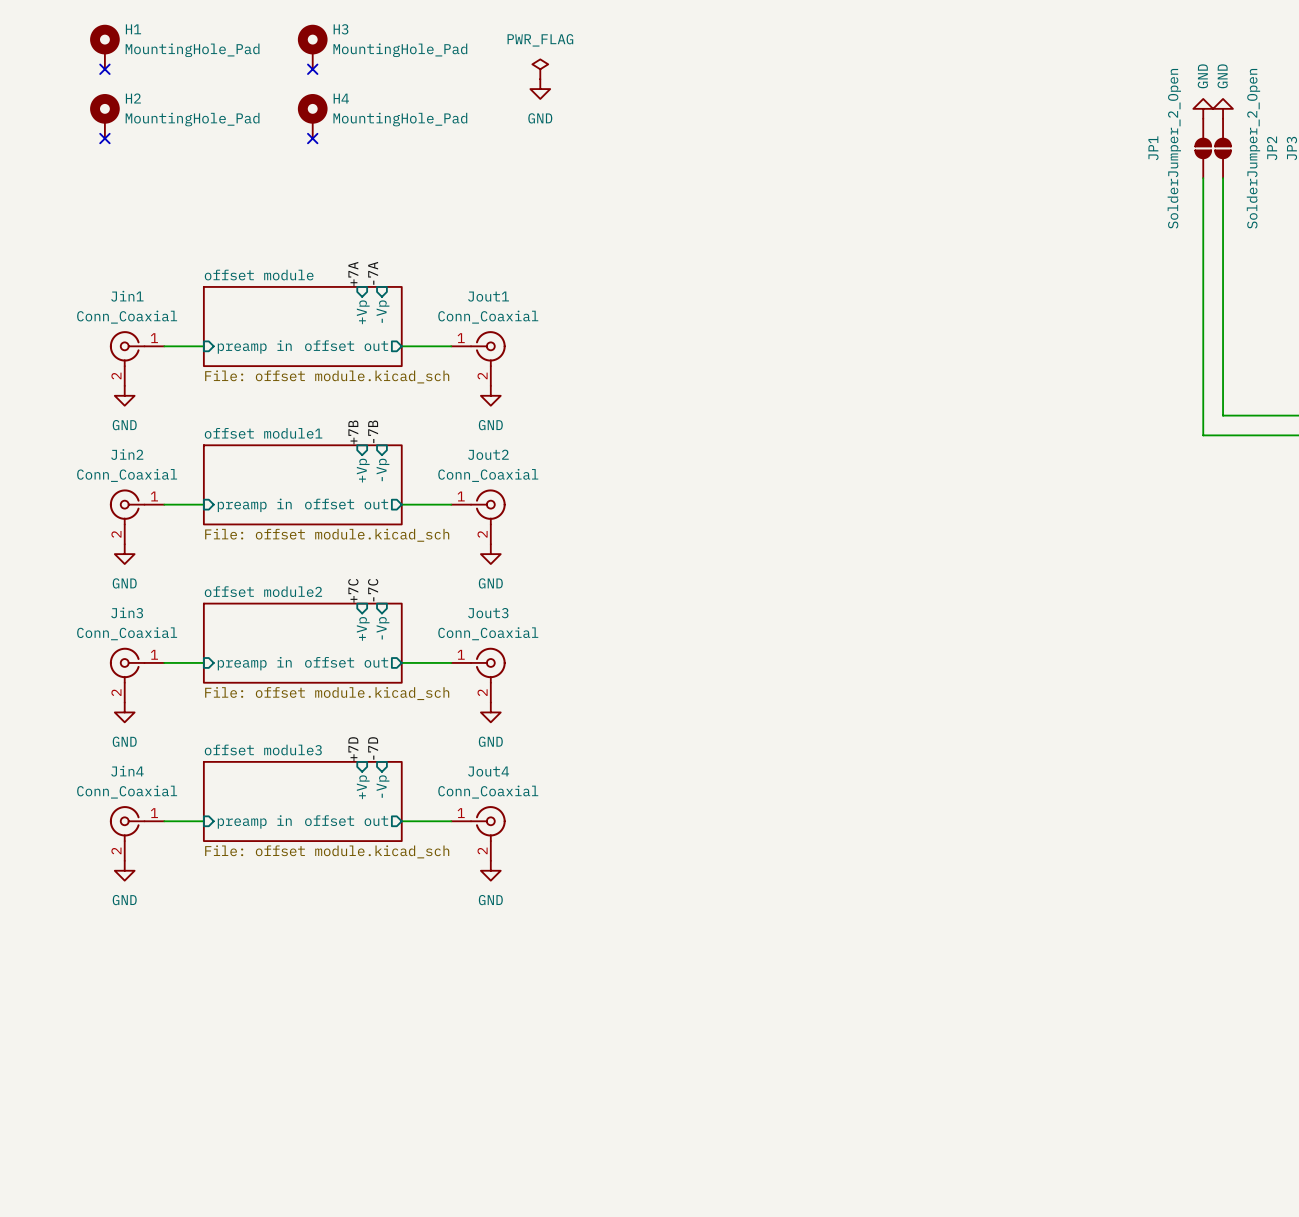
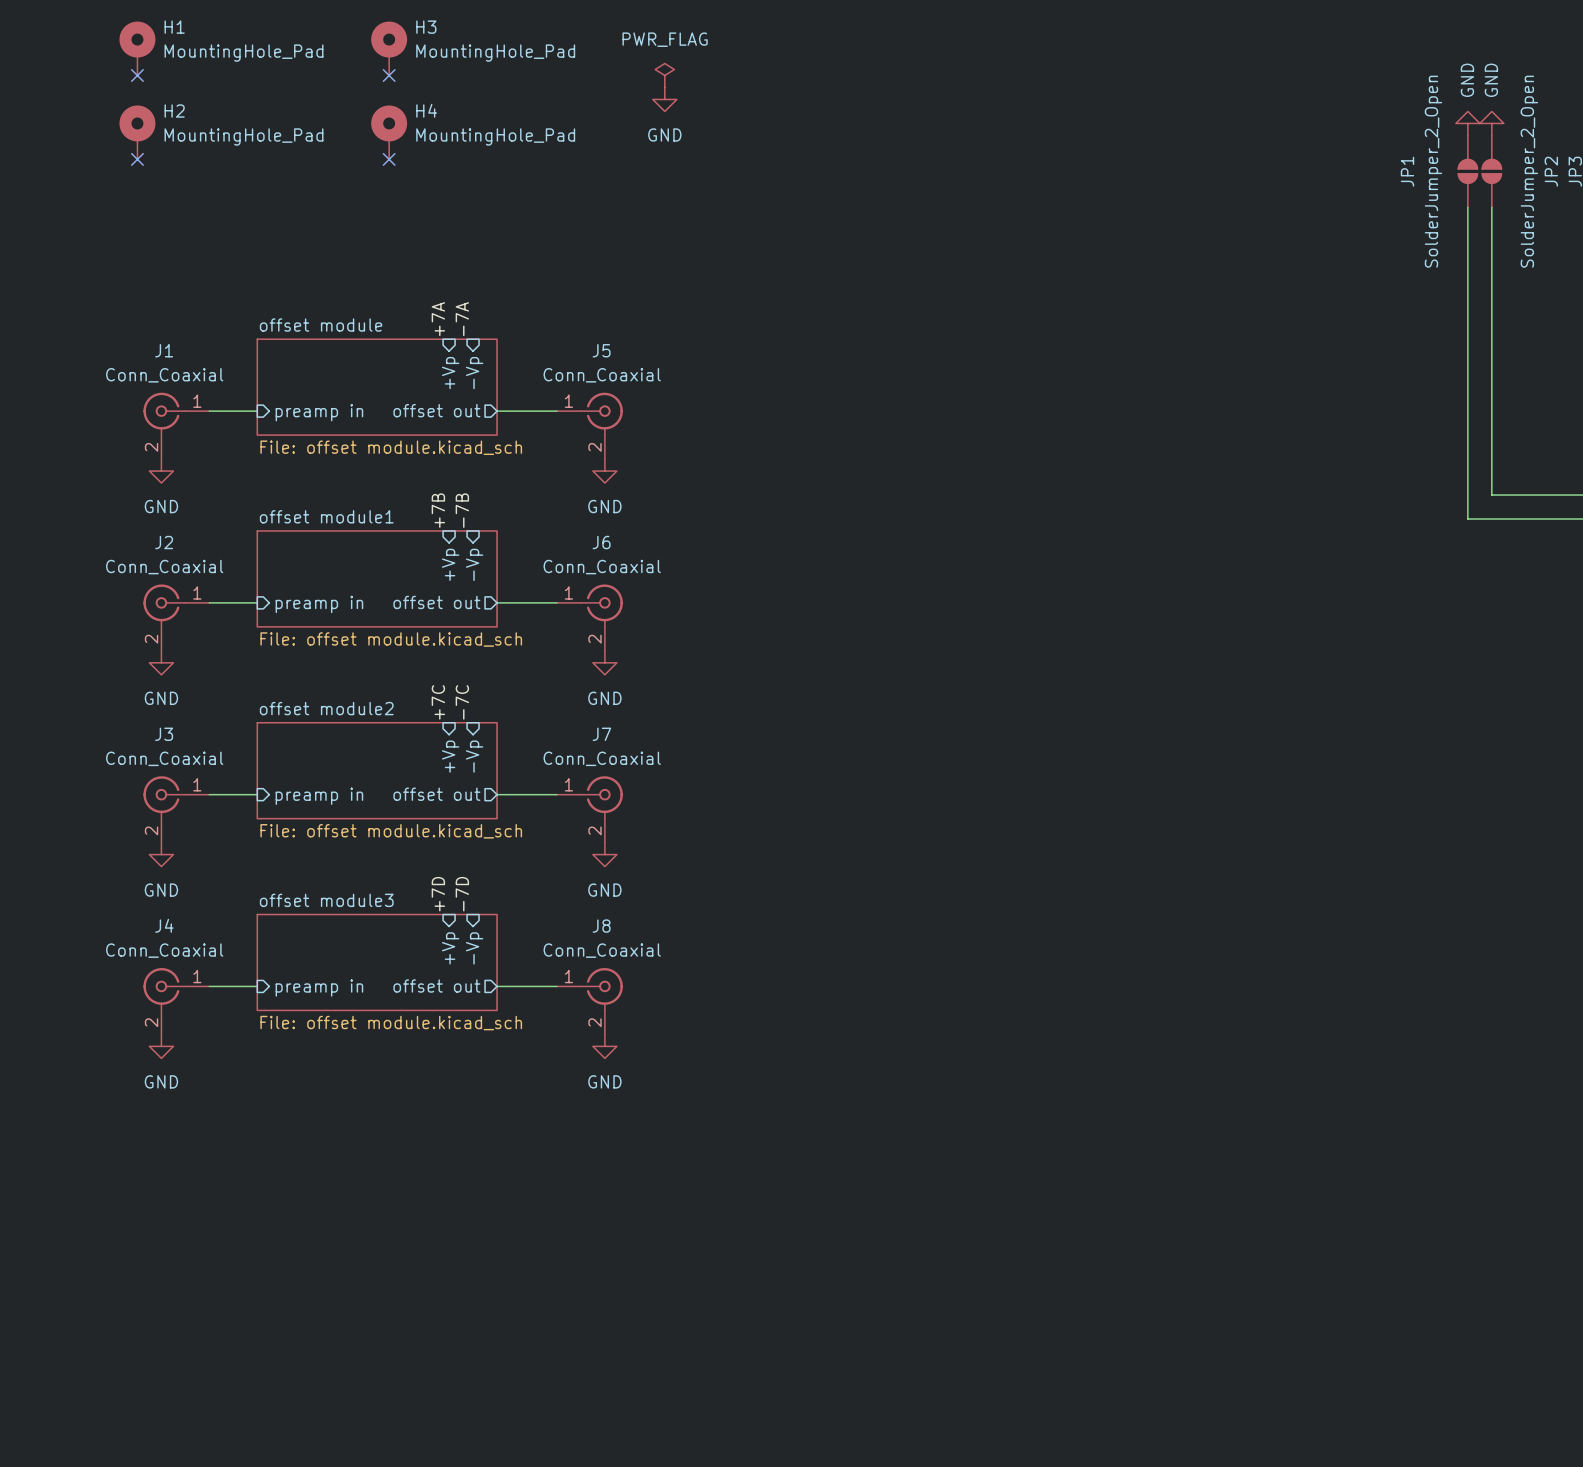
Jin1 name: Jin1 (127, 296) -> J1 (164, 350)
Jout1 name: Jout1 (488, 296) -> J5 (601, 350)
Jin2 name: Jin2 (127, 454) -> J2 (164, 542)
Jout2 name: Jout2 (488, 454) -> J6 (601, 542)
Jin3 name: Jin3 (127, 612) -> J3 (164, 734)
Jout3 name: Jout3 (488, 613) -> J7 (601, 734)
Jin4 name: Jin4 (127, 771) -> J4 (164, 925)
Jout4 name: Jout4 (488, 771) -> J8 (601, 926)

